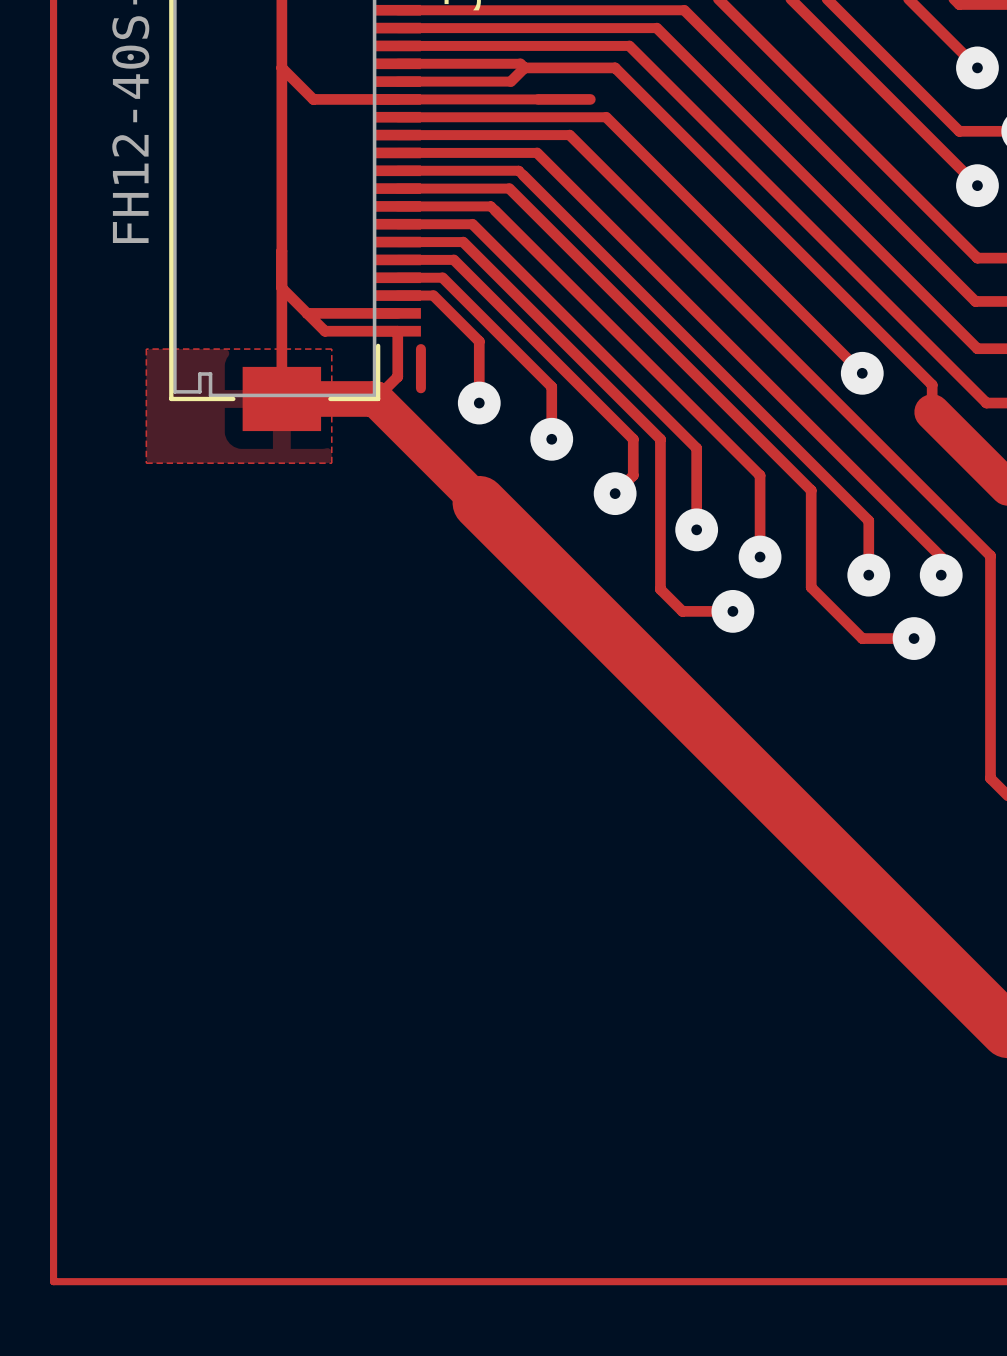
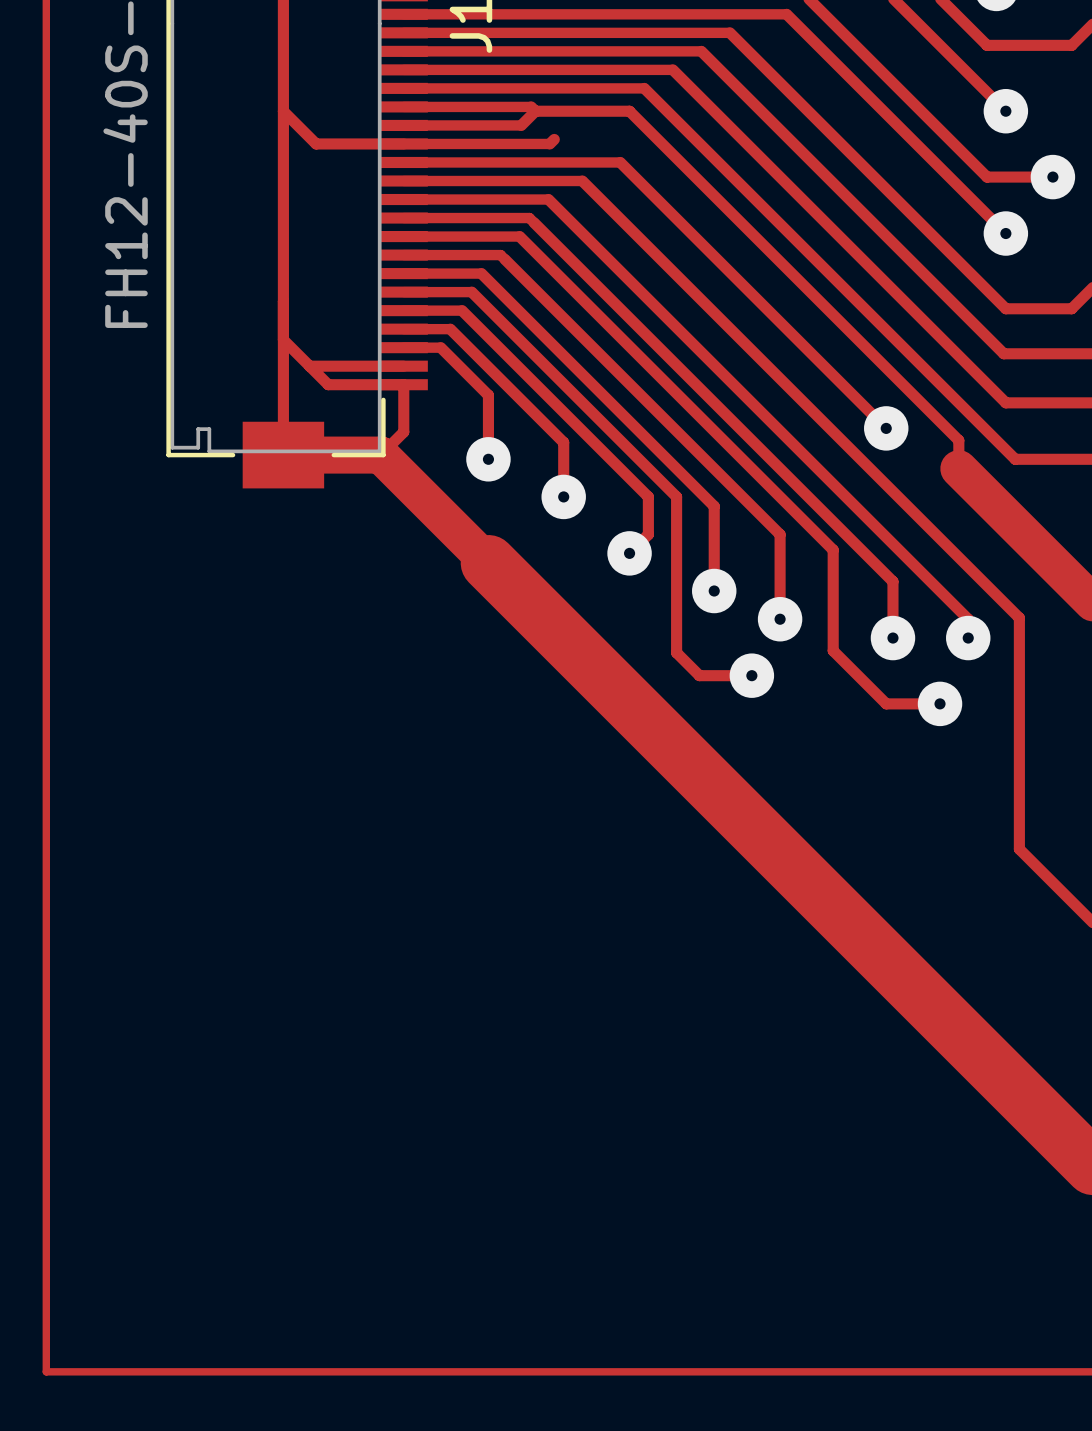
track: (538, 99) (590, 99) -> (549, 143) (554, 139)
zone outline: (146, 349) (146, 463) (331, 463) (331, 349) (146, 349) -> none
track: (420, 349) (420, 388) -> none

